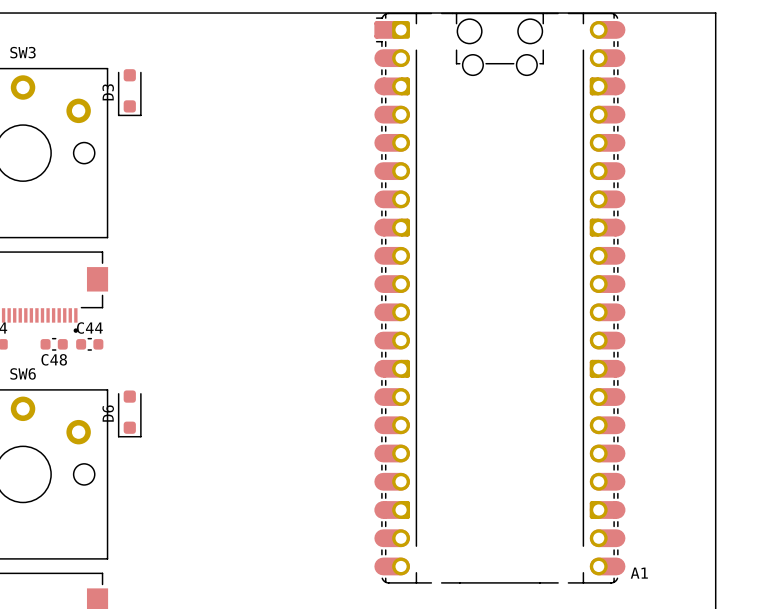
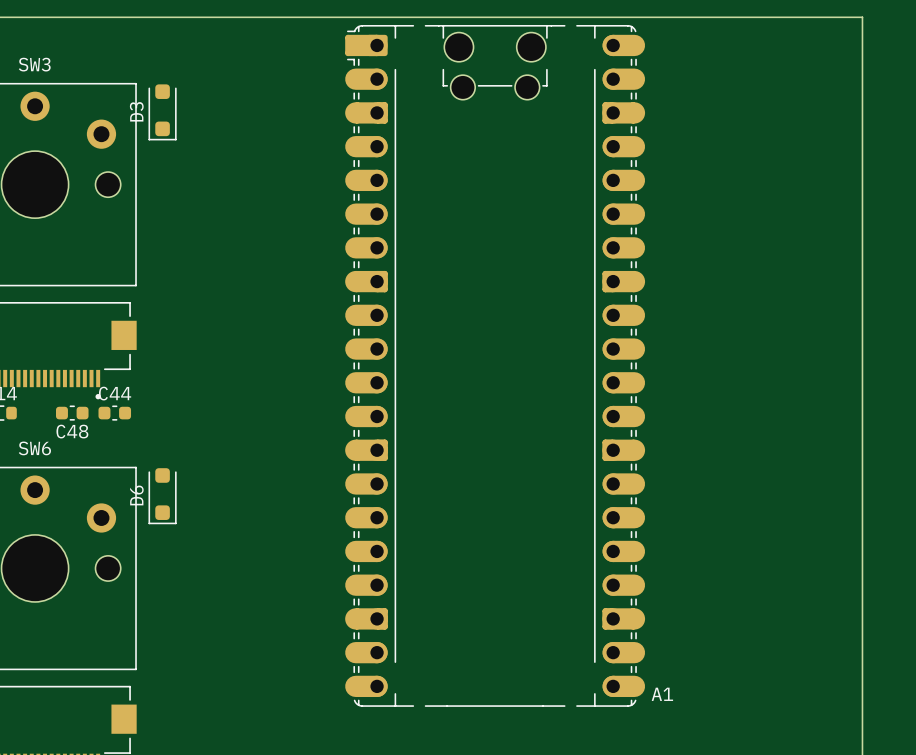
A1 position: (499, 298) -> (495, 365)

